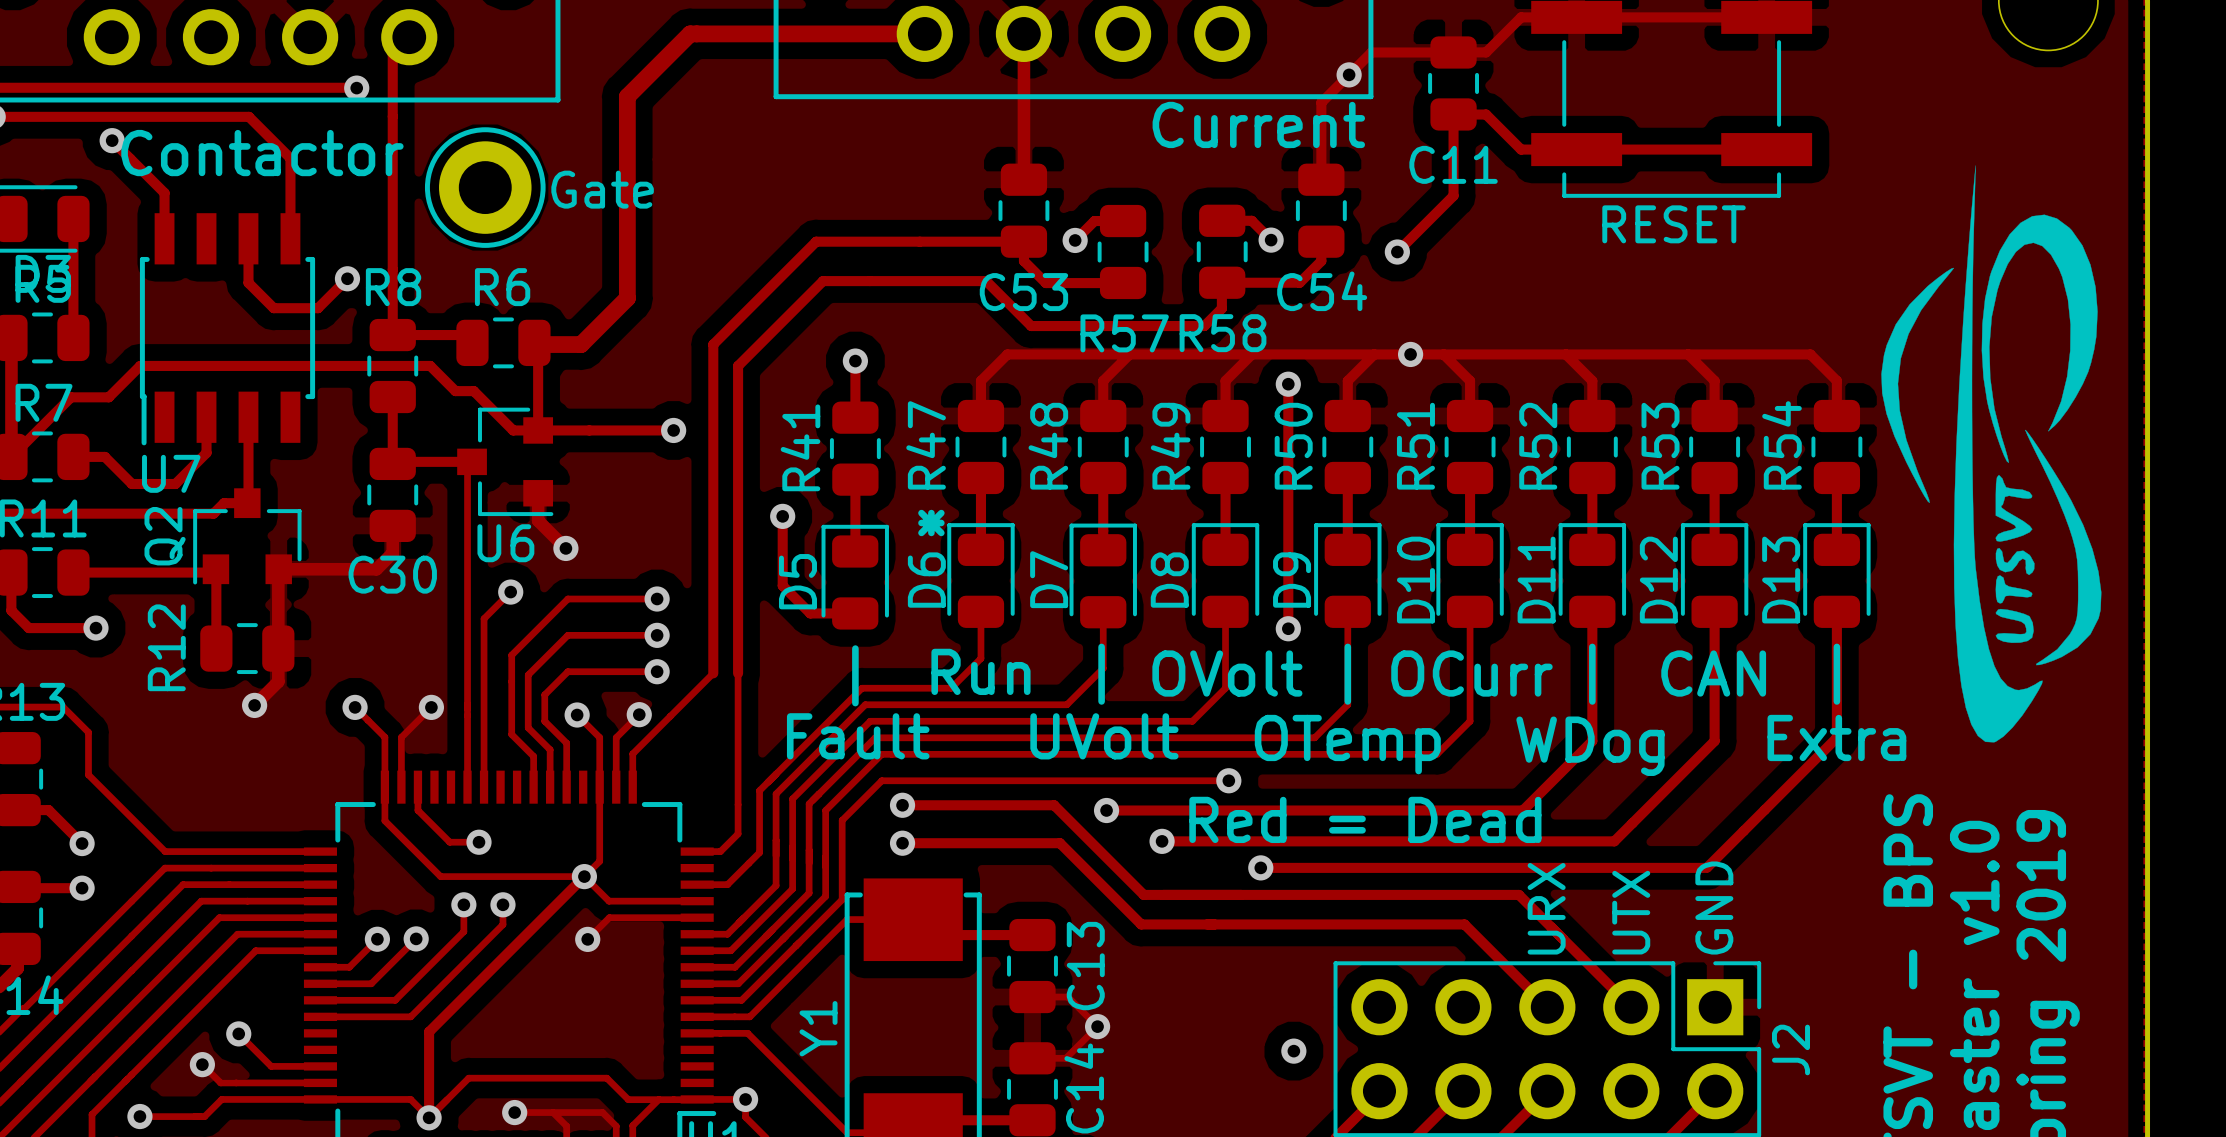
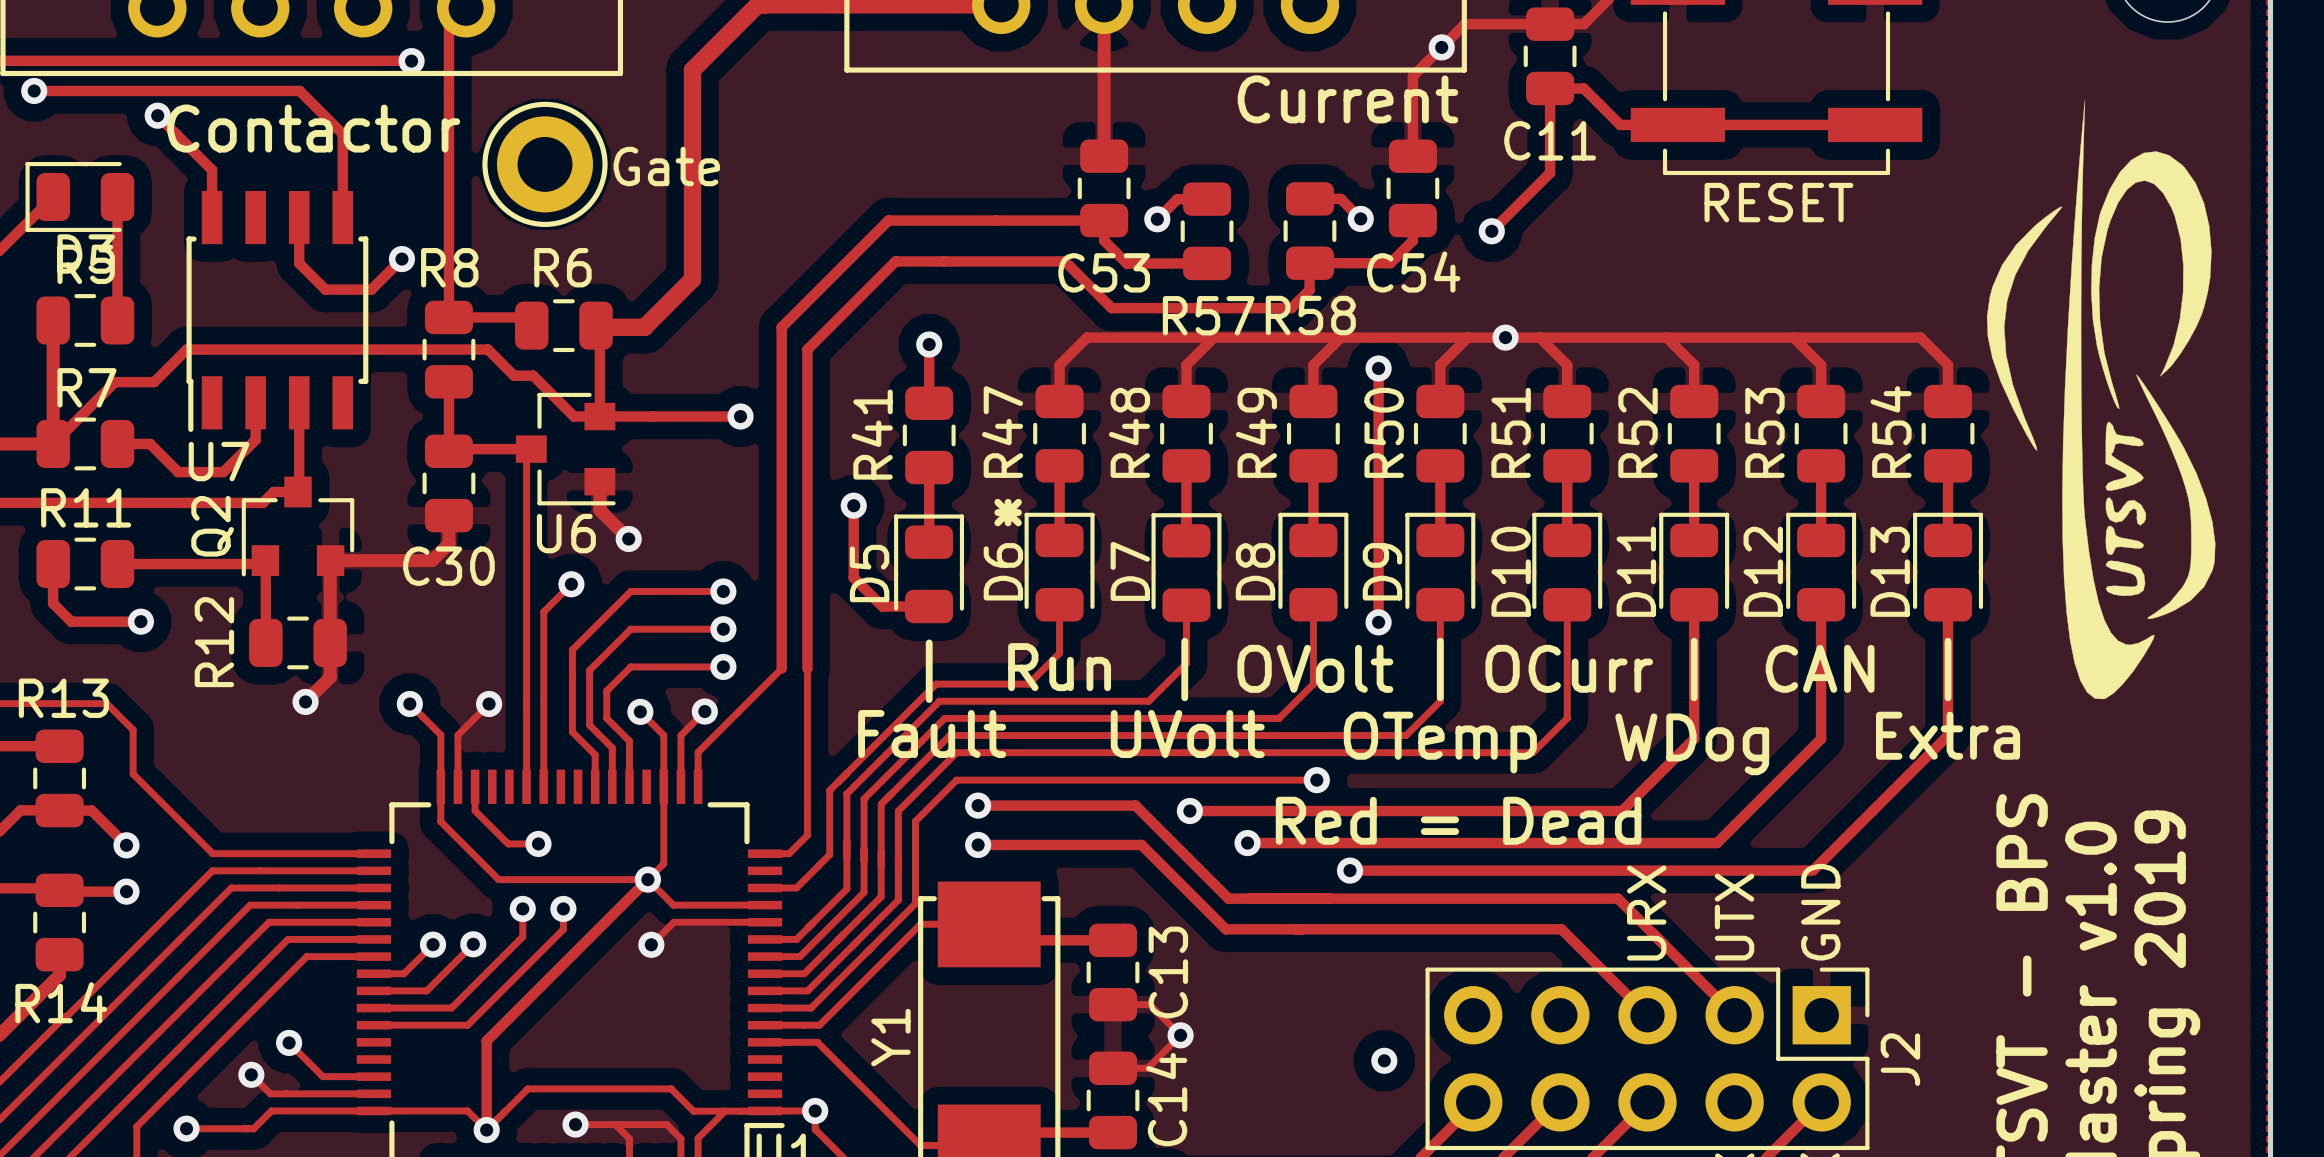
drawing position: (1991, 453) -> (2101, 399)

